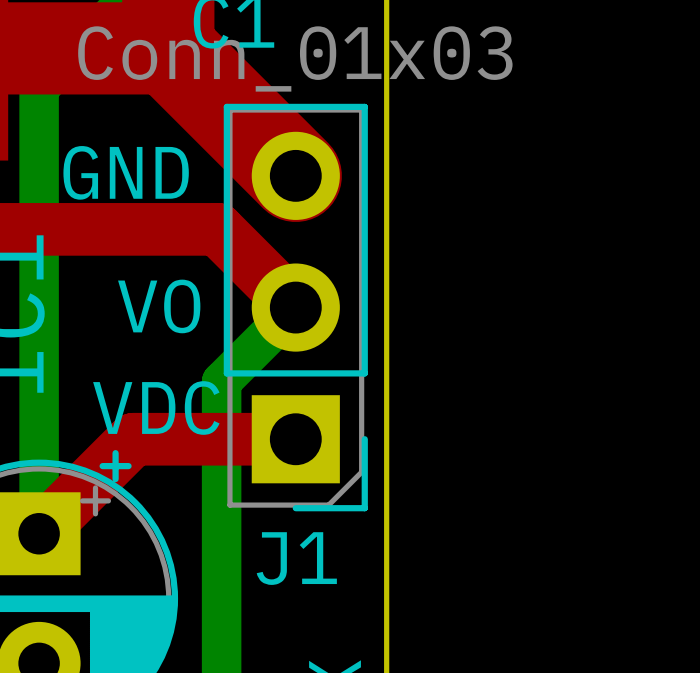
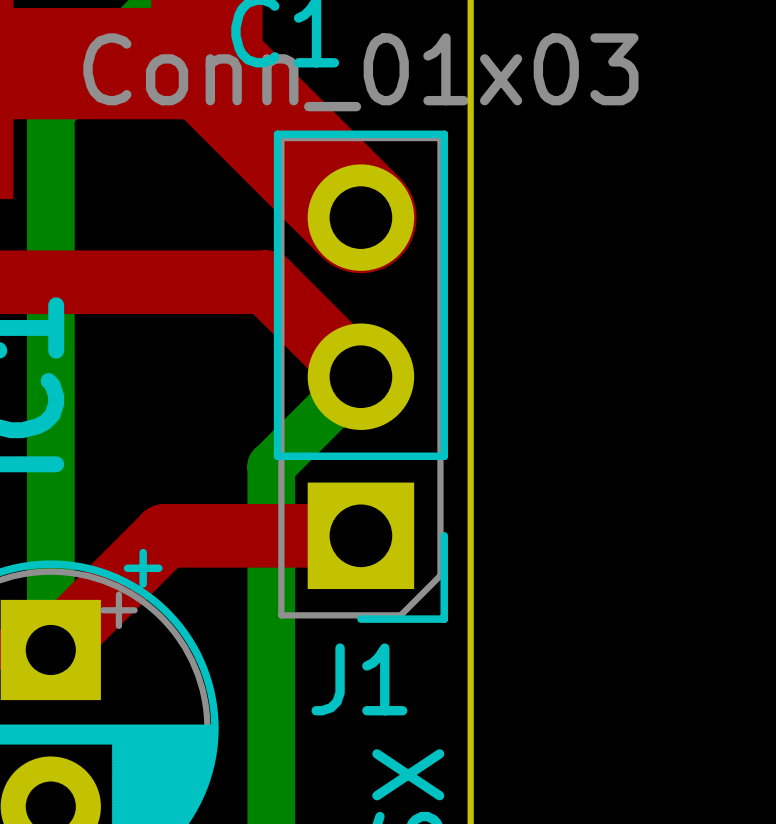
text: GND (126, 172) -> none
text: VO (159, 306) -> none
text: VDC (156, 408) -> none

